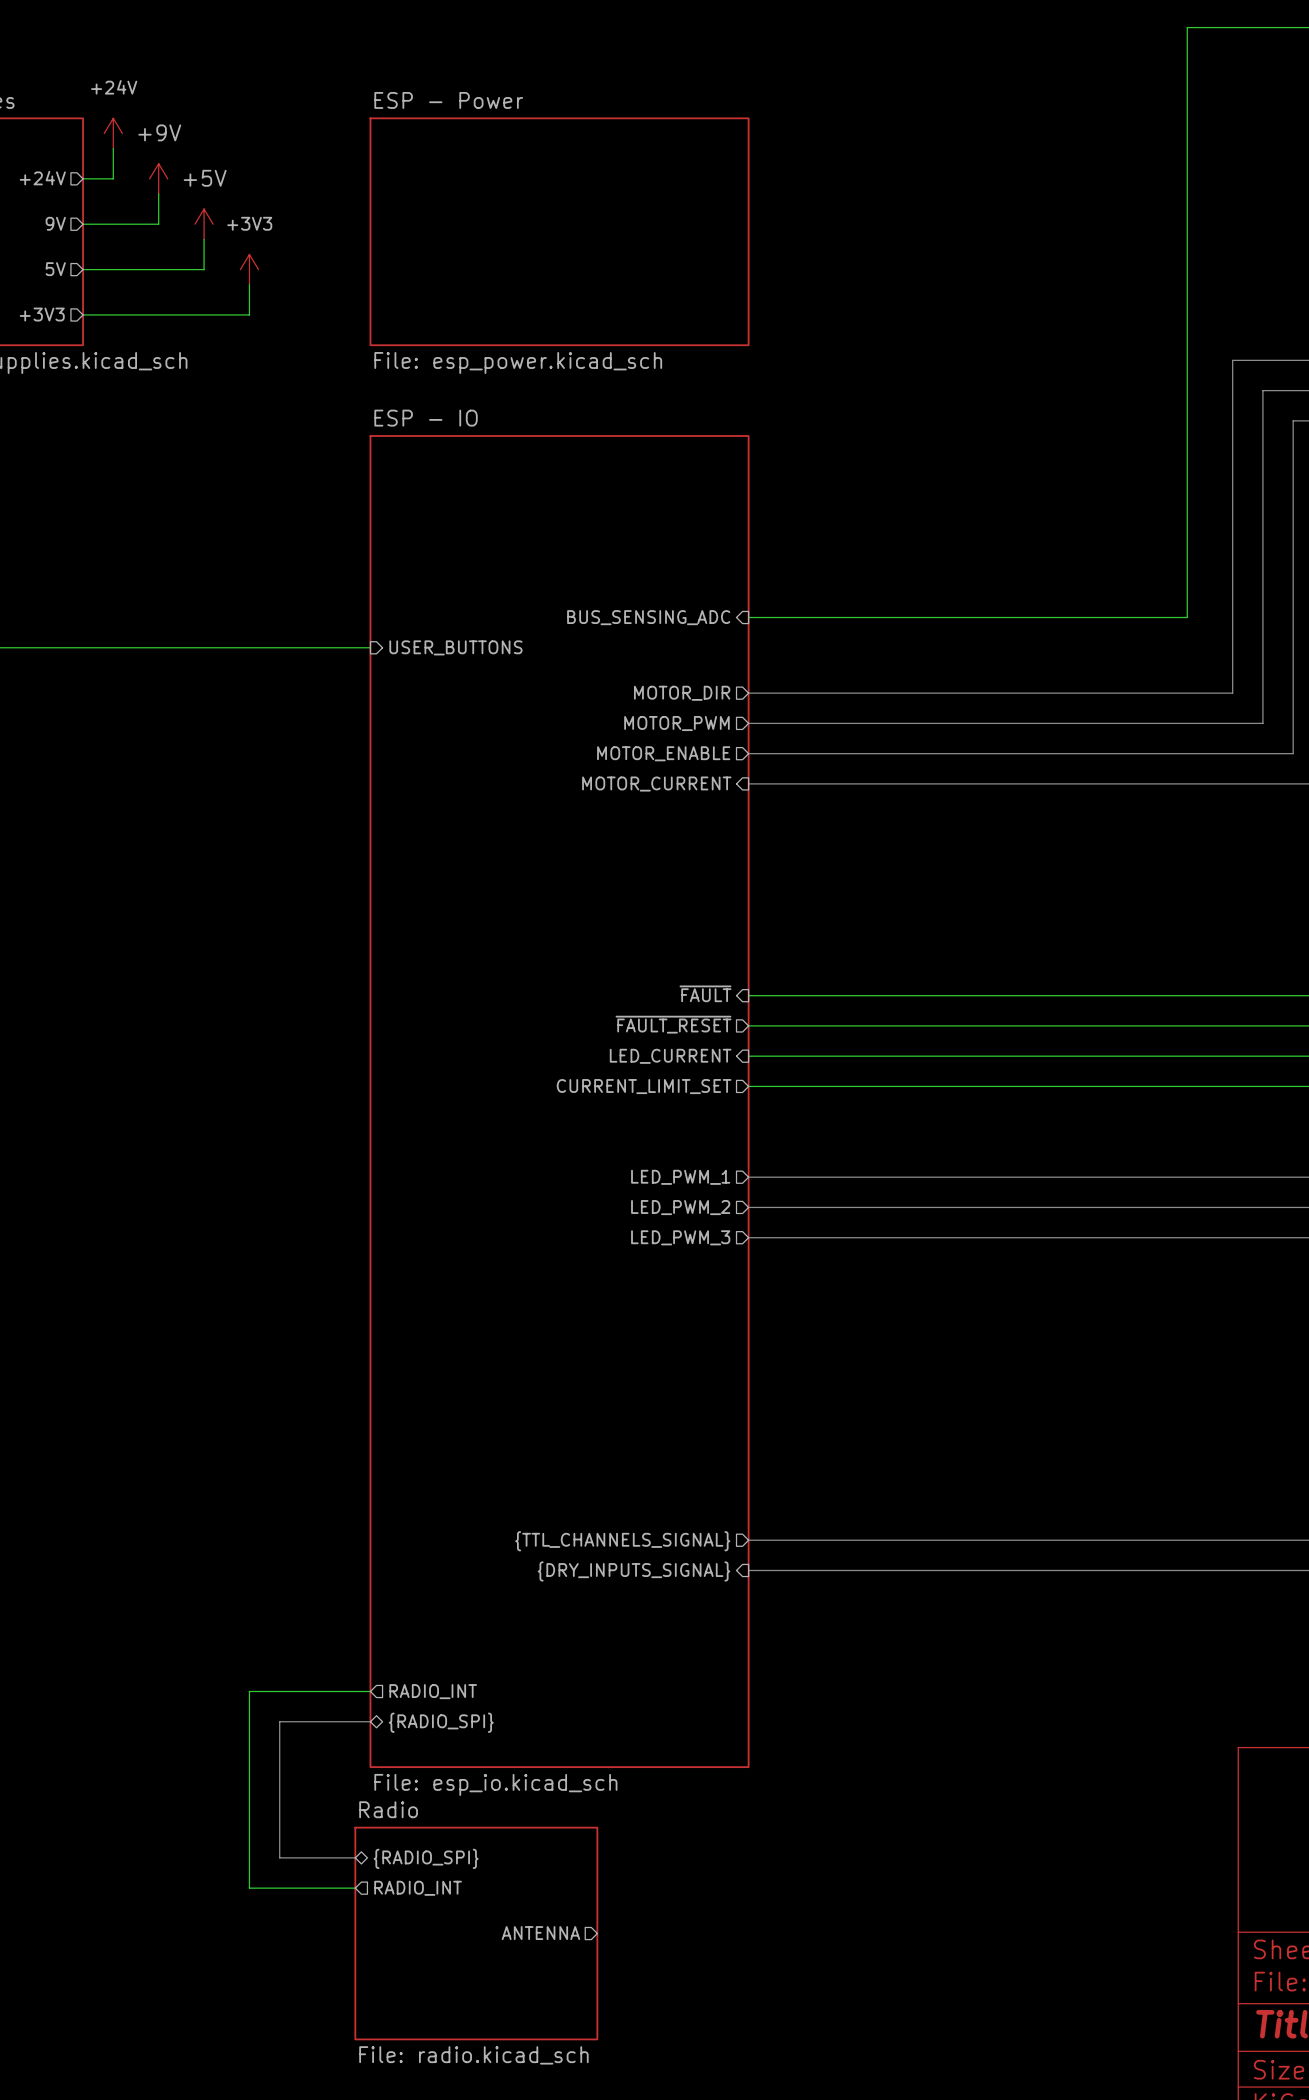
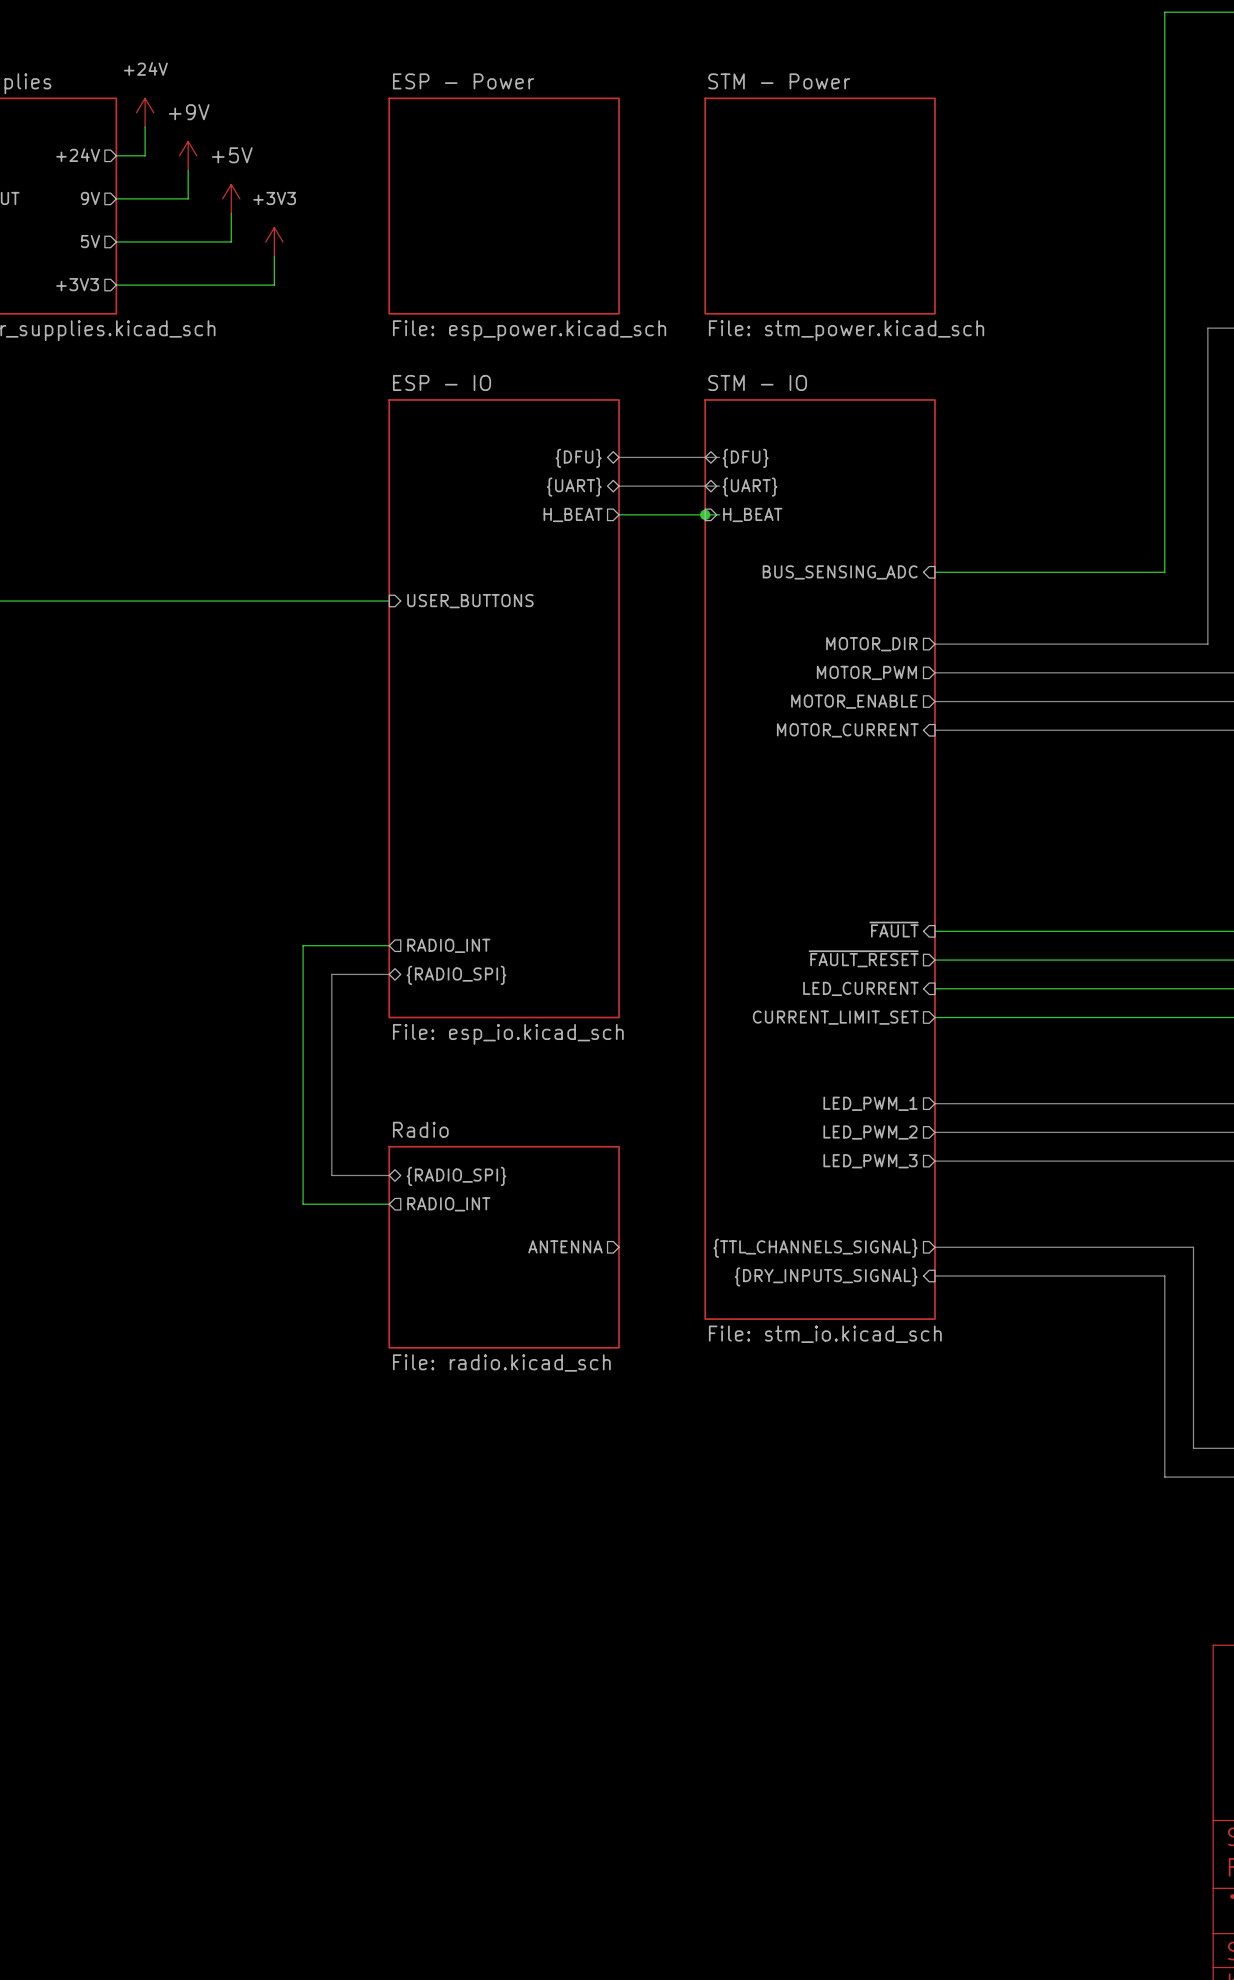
sheet ESP - Power: none -> File: esp_power.kicad_sch (504, 206)
sheet ESP - Power: File: esp_power.kicad_sch (559, 231) -> none
sheet STM - Power: none -> File: stm_power.kicad_sch (820, 206)
bus: none -> (619, 457) (719, 457)
sheet pin: none -> {DFU} (578, 458)
sheet pin: none -> {DFU} (745, 458)
bus: none -> (619, 486) (719, 486)
sheet pin: none -> {UART} (574, 487)
sheet pin: none -> {UART} (750, 487)
sheet pin: none -> H_BEAT (573, 514)
wire: none -> (619, 514) (719, 514)
junction: none -> (705, 514)
sheet pin: none -> H_BEAT (752, 514)
sheet pin position: BUS_SENSING_ADC (648, 617) -> BUS_SENSING_ADC (840, 572)
wire: (748, 617) (945, 617) -> none
sheet pin position: MOTOR_DIR (682, 693) -> MOTOR_DIR (871, 644)
bus: (748, 693) (945, 693) -> none
sheet pin position: MOTOR_PWM (676, 723) -> MOTOR_PWM (866, 672)
bus: (748, 723) (945, 723) -> none
sheet pin position: MOTOR_ENABLE (663, 753) -> MOTOR_ENABLE (854, 701)
bus: (748, 753) (945, 753) -> none
sheet ESP - IO: none -> File: esp_io.kicad_sch (504, 708)
bus: (748, 783) (945, 783) -> none
sheet pin position: MOTOR_CURRENT (656, 784) -> MOTOR_CURRENT (847, 730)
sheet STM - IO: none -> File: stm_io.kicad_sch (820, 859)
sheet pin position: ~{FAULT} (705, 993) -> ~{FAULT} (894, 929)
wire: (748, 995) (945, 995) -> none
wire: none -> (389, 945) (303, 945) (303, 1204) (389, 1204)
sheet pin: none -> RADIO_INT (448, 945)
sheet pin position: ~{FAULT_RESET} (673, 1024) -> ~{FAULT_RESET} (863, 958)
wire: (748, 1025) (945, 1025) -> none
bus: none -> (389, 974) (331, 974) (331, 1175) (389, 1175)
sheet pin: none -> {RADIO_SPI} (456, 975)
sheet pin position: LED_CURRENT (670, 1056) -> LED_CURRENT (860, 988)
wire: (748, 1056) (945, 1056) -> none
sheet pin position: CURRENT_LIMIT_SET (644, 1086) -> CURRENT_LIMIT_SET (835, 1017)
wire: (748, 1086) (945, 1086) -> none
sheet ESP - IO: File: esp_io.kicad_sch (559, 1101) -> none
sheet pin position: LED_PWM_1 (680, 1177) -> LED_PWM_1 (870, 1103)
bus: (748, 1177) (945, 1177) -> none
sheet pin position: LED_PWM_2 (680, 1207) -> LED_PWM_2 (870, 1132)
bus: (748, 1207) (945, 1207) -> none
sheet pin position: LED_PWM_3 (680, 1237) -> LED_PWM_3 (870, 1161)
bus: (748, 1237) (945, 1237) -> none
sheet pin: none -> {RADIO_SPI} (456, 1176)
sheet pin: none -> RADIO_INT (448, 1204)
sheet Radio: none -> File: radio.kicad_sch (504, 1247)
sheet pin: none -> ANTENNA (565, 1246)
bus: (748, 1540) (1217, 1540) -> (934, 1247) (1193, 1247) (1193, 1448)
sheet pin position: {TTL_CHANNELS_SIGNAL} (622, 1541) -> {TTL_CHANNELS_SIGNAL} (815, 1248)
bus: (748, 1570) (1187, 1570) -> (934, 1276) (1164, 1276) (1164, 1477)
sheet pin position: {DRY_INPUTS_SIGNAL} (634, 1571) -> {DRY_INPUTS_SIGNAL} (826, 1276)
wire: (370, 1691) (249, 1691) (249, 1888) (355, 1888) -> none
sheet pin: RADIO_INT (433, 1691) -> none
bus: (370, 1721) (279, 1721) (279, 1857) (355, 1857) -> none
sheet pin: {RADIO_SPI} (441, 1722) -> none
sheet pin: {RADIO_SPI} (426, 1858) -> none
sheet pin: RADIO_INT (418, 1888) -> none
sheet Radio: File: radio.kicad_sch (476, 1933) -> none
sheet pin: ANTENNA (540, 1933) -> none

